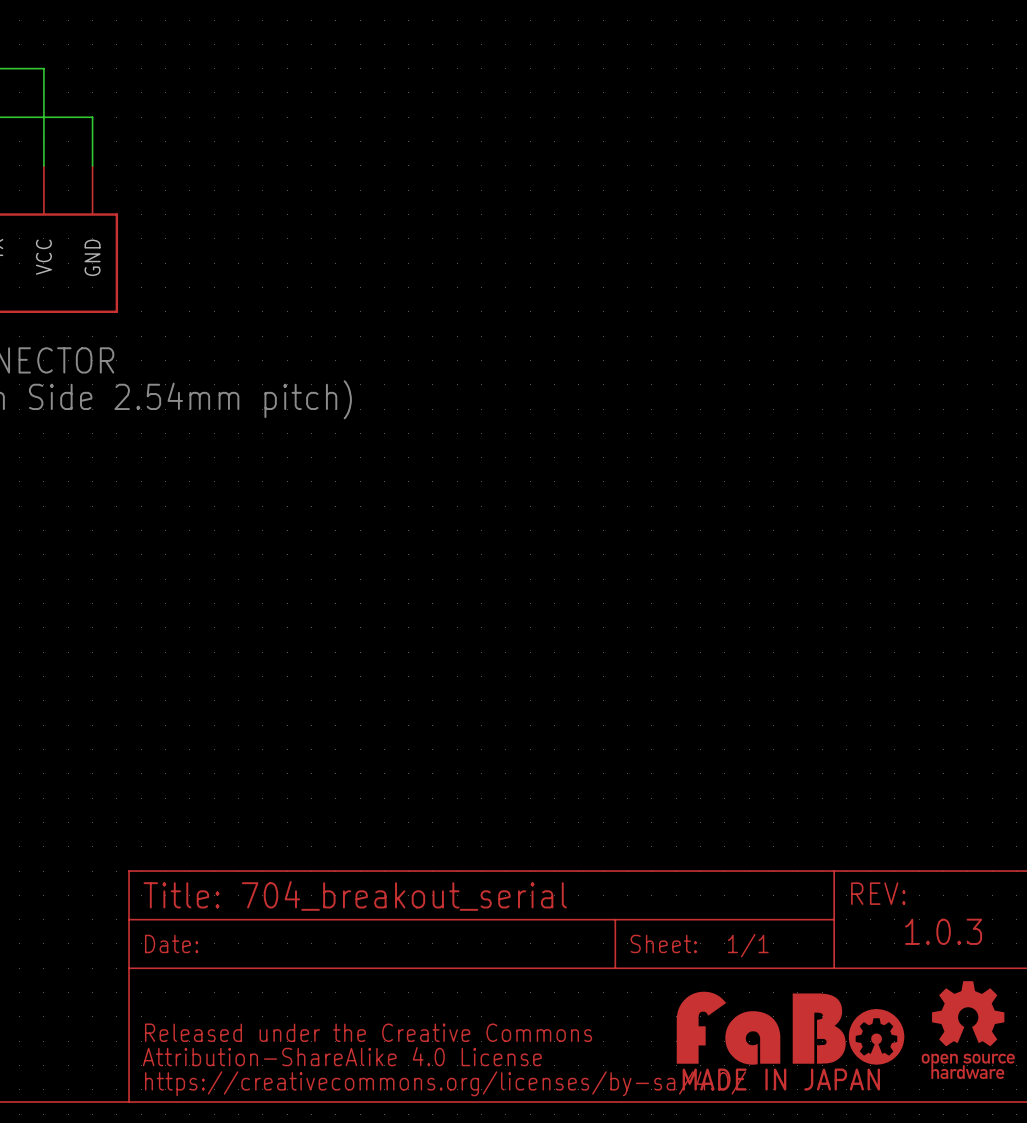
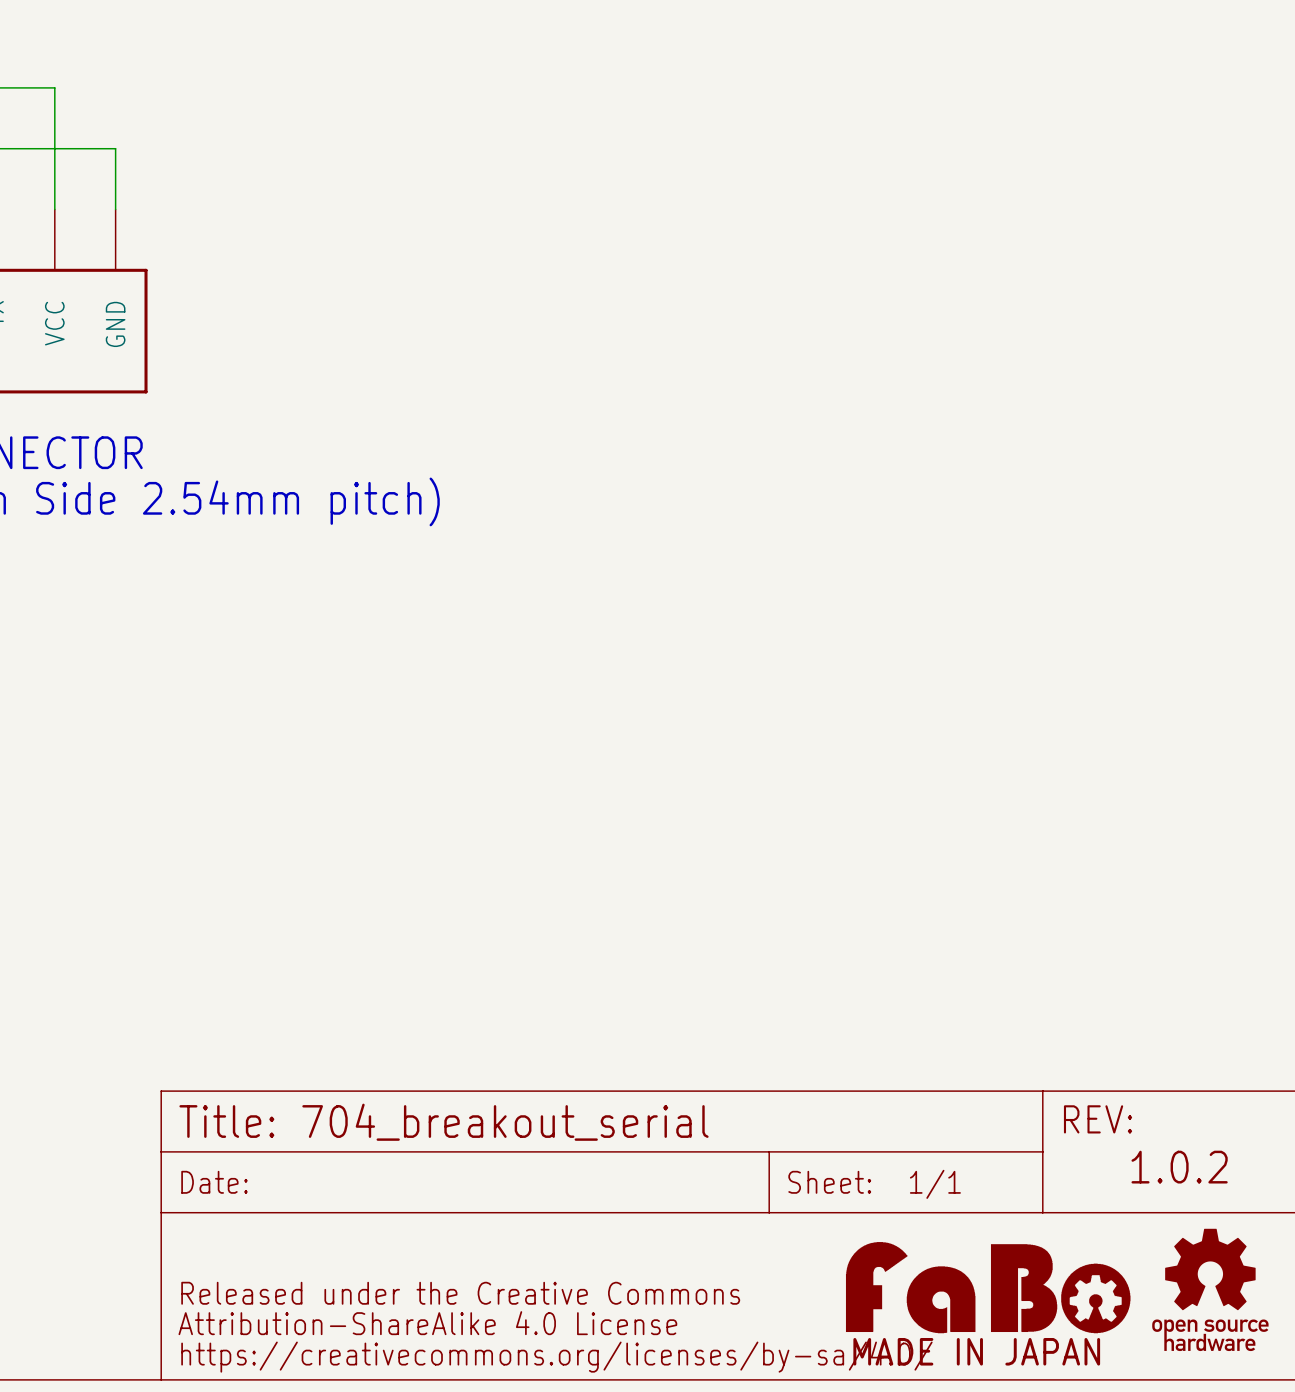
text: 1.0.3 (943, 931) -> 1.0.2 (1179, 1167)

